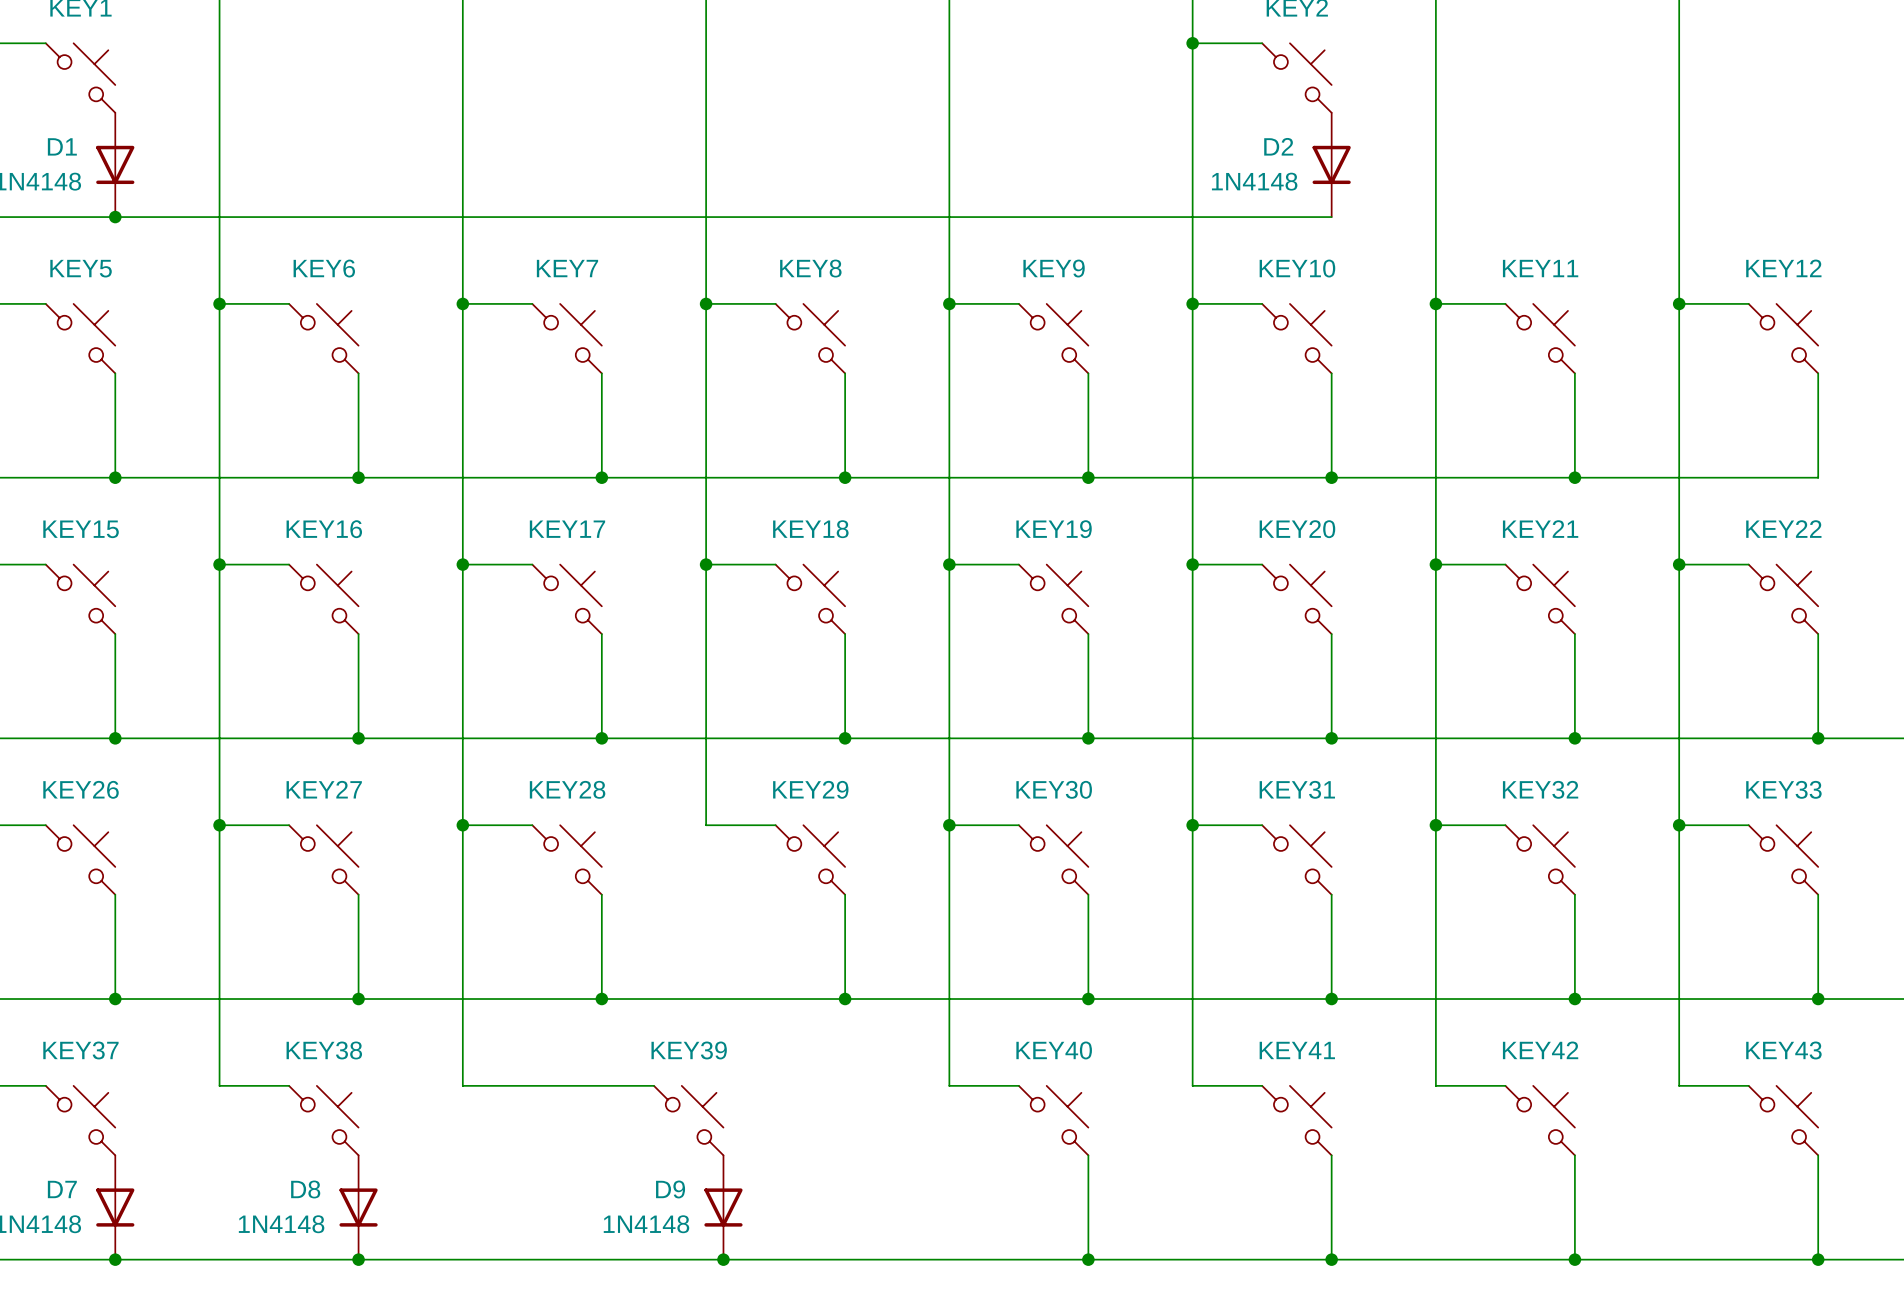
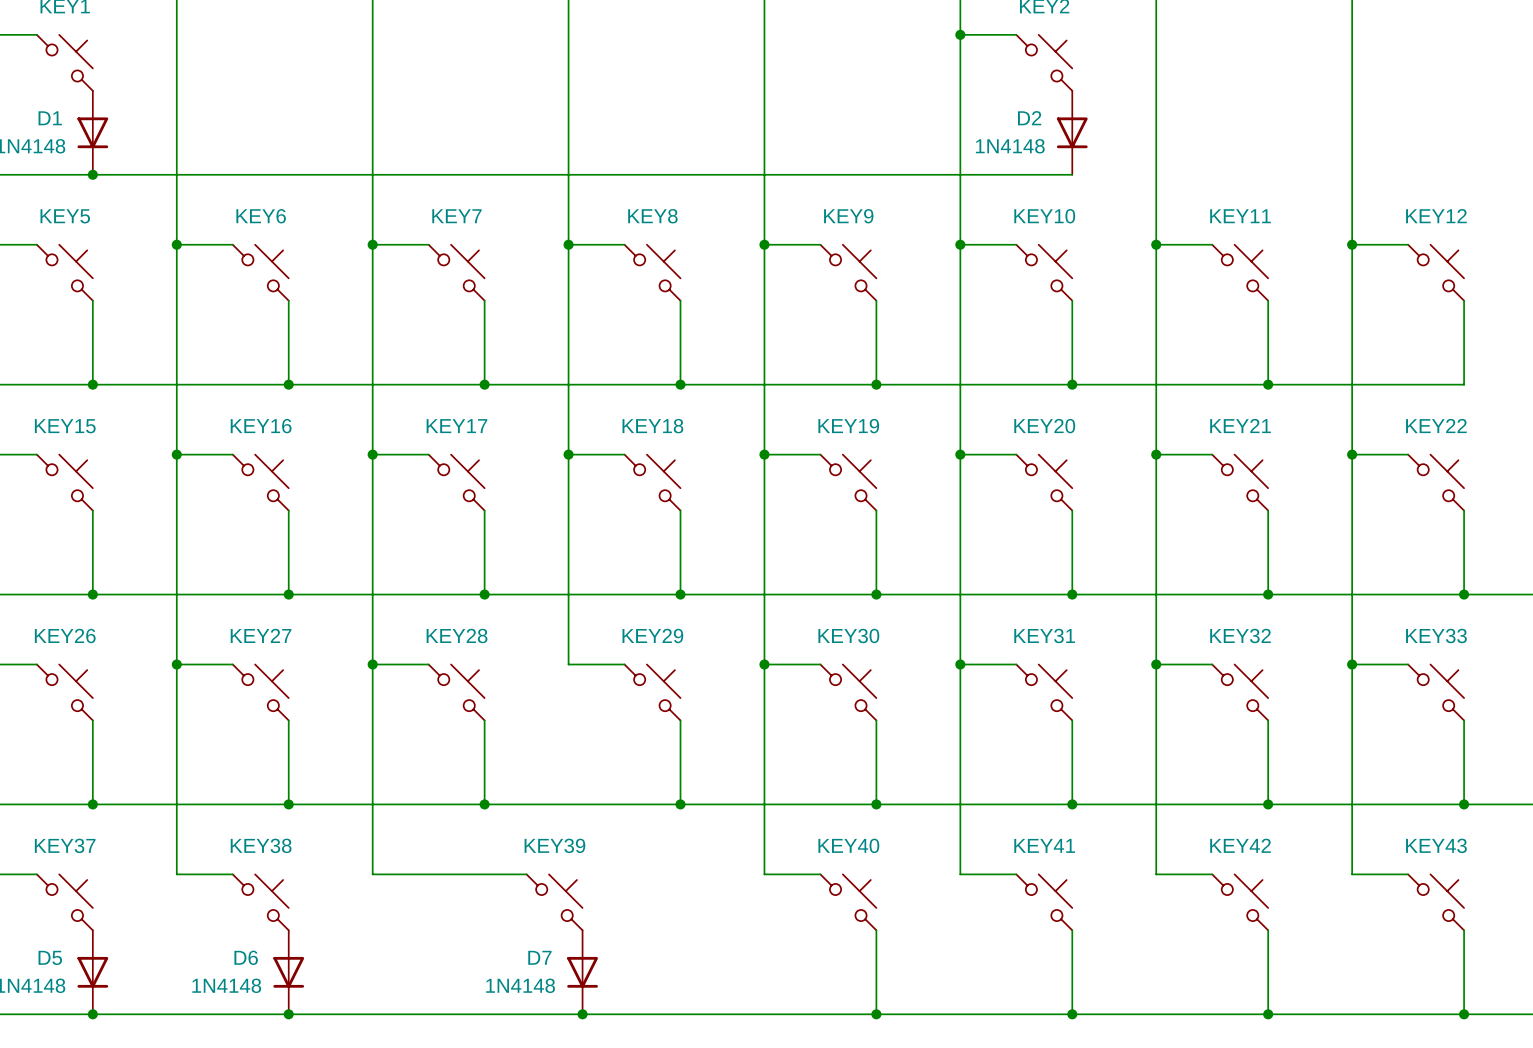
D7 name: D7 (62, 1189) -> D5 (50, 957)
D8 name: D8 (305, 1189) -> D6 (246, 957)
D9 name: D9 (670, 1189) -> D7 (539, 957)

